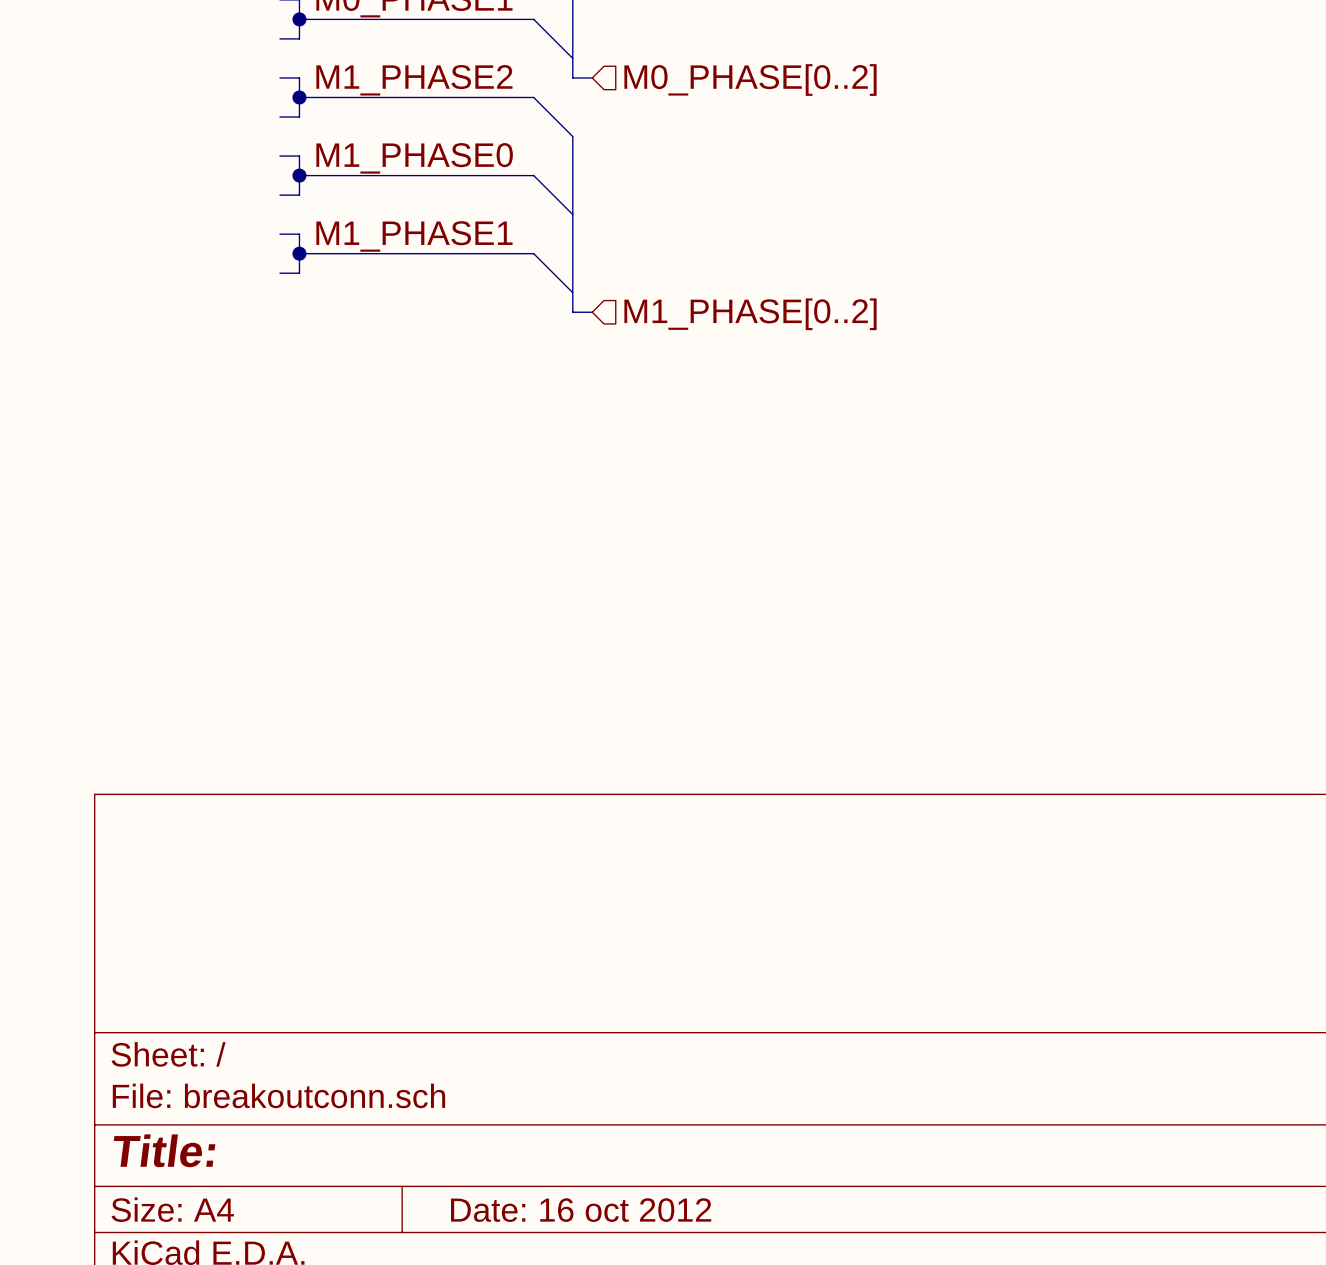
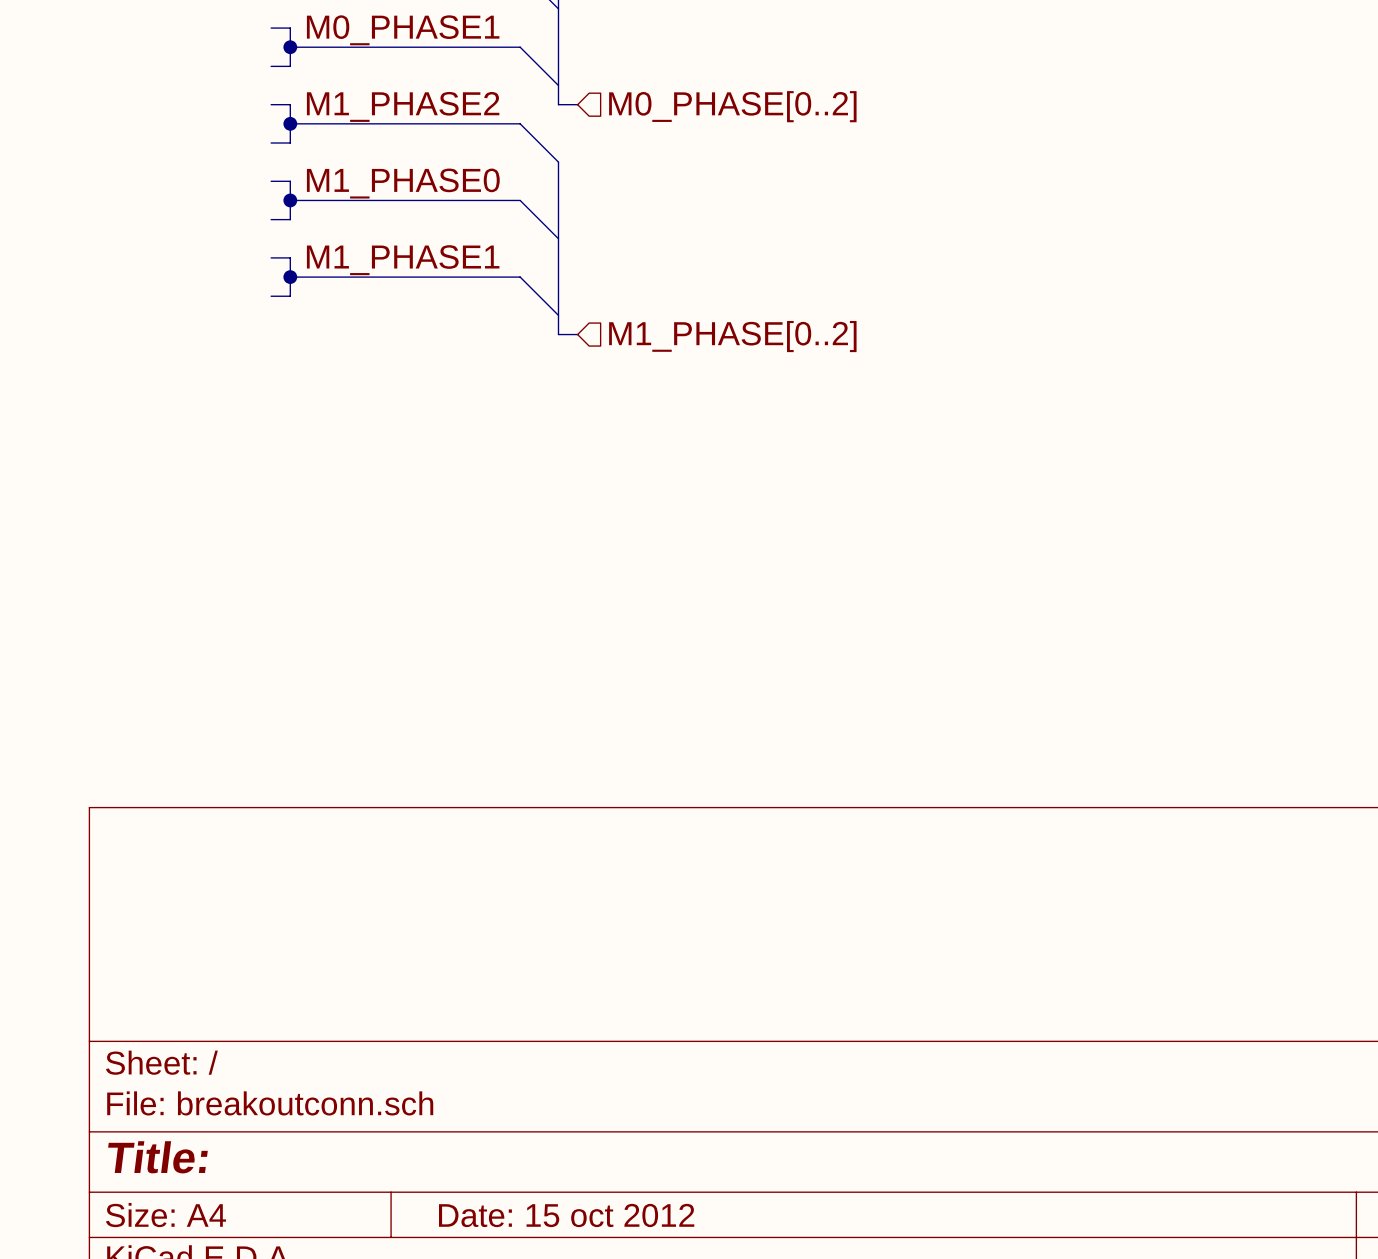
title block: Date: 16 oct 2012 (581, 1210) -> Date: 15 oct 2012 (566, 1215)

